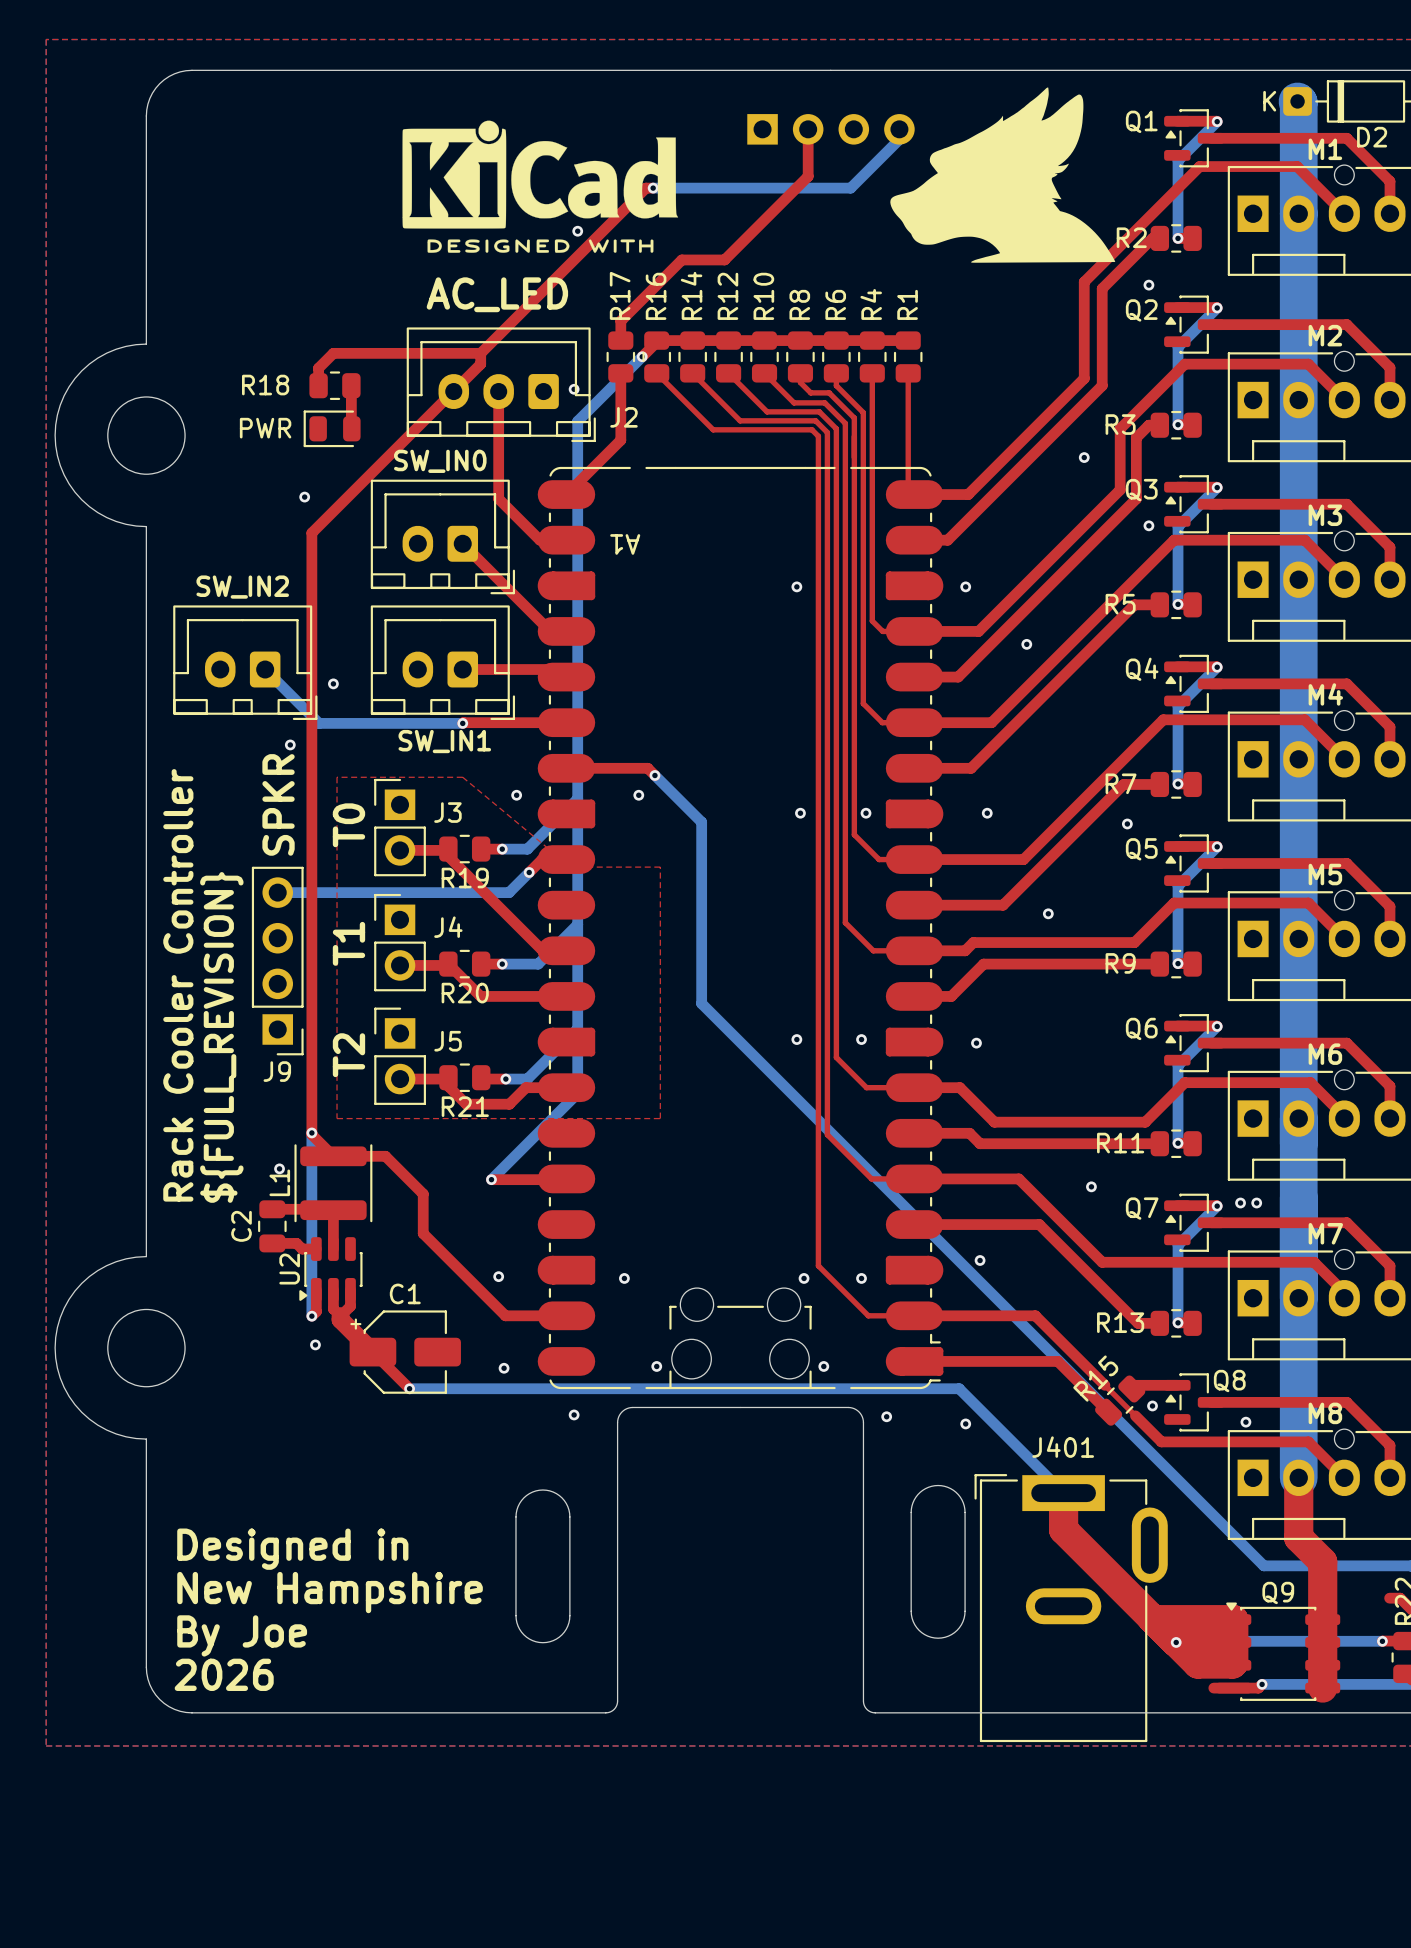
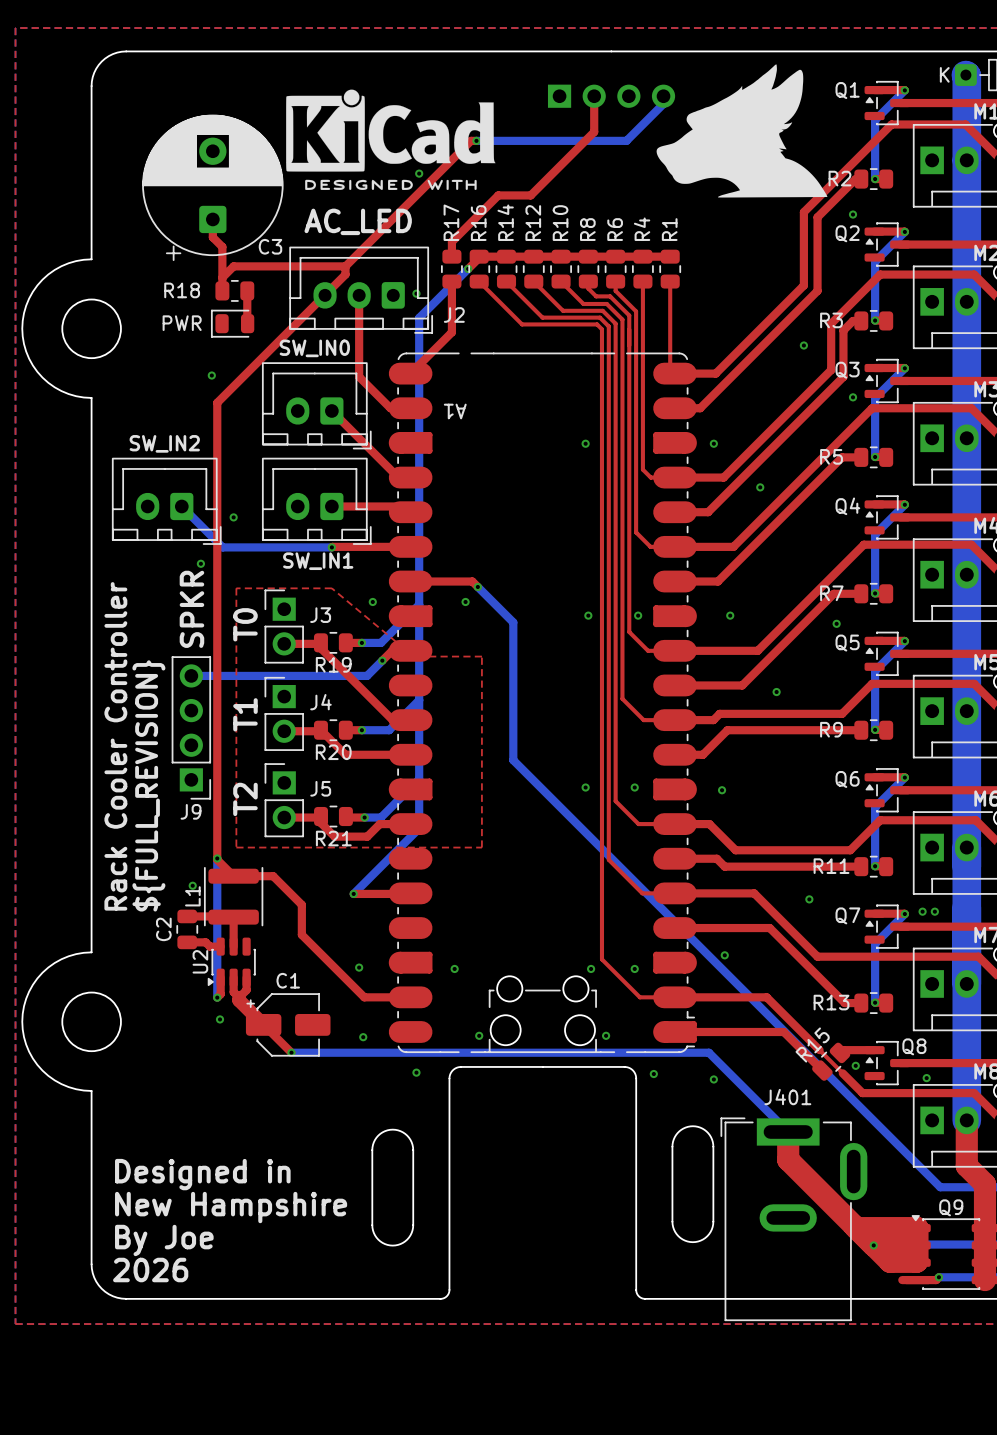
C3: none -> (212, 187)
top track: none -> (212, 219) (212, 237) (222, 246) (222, 277)

